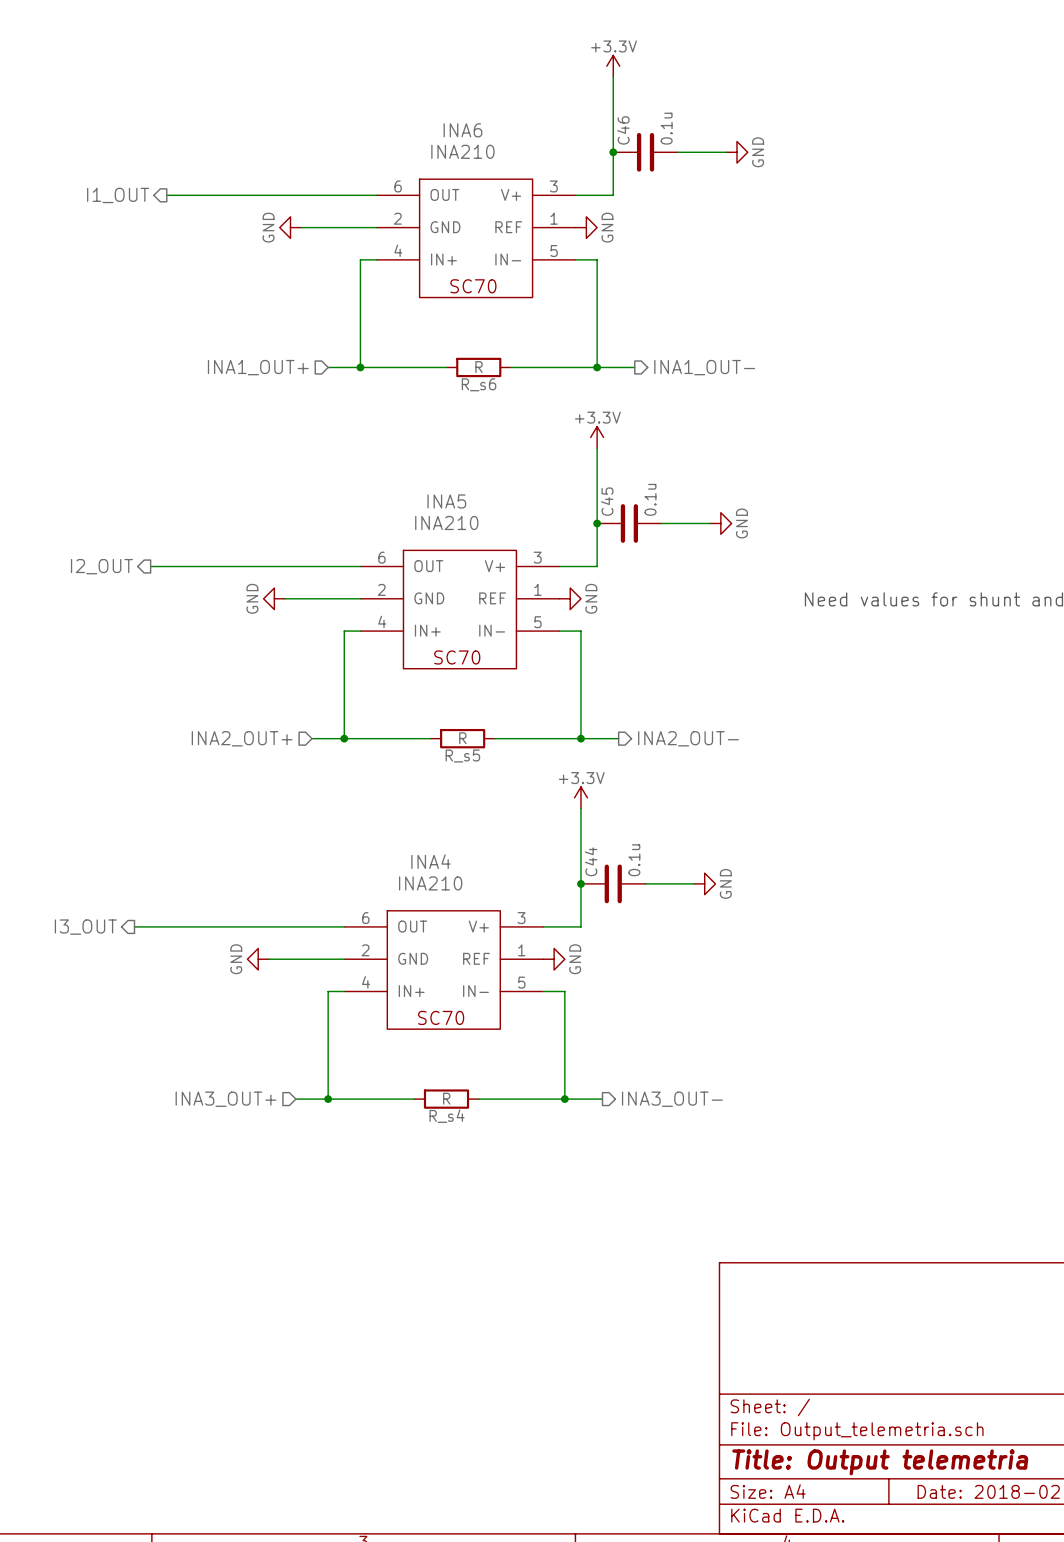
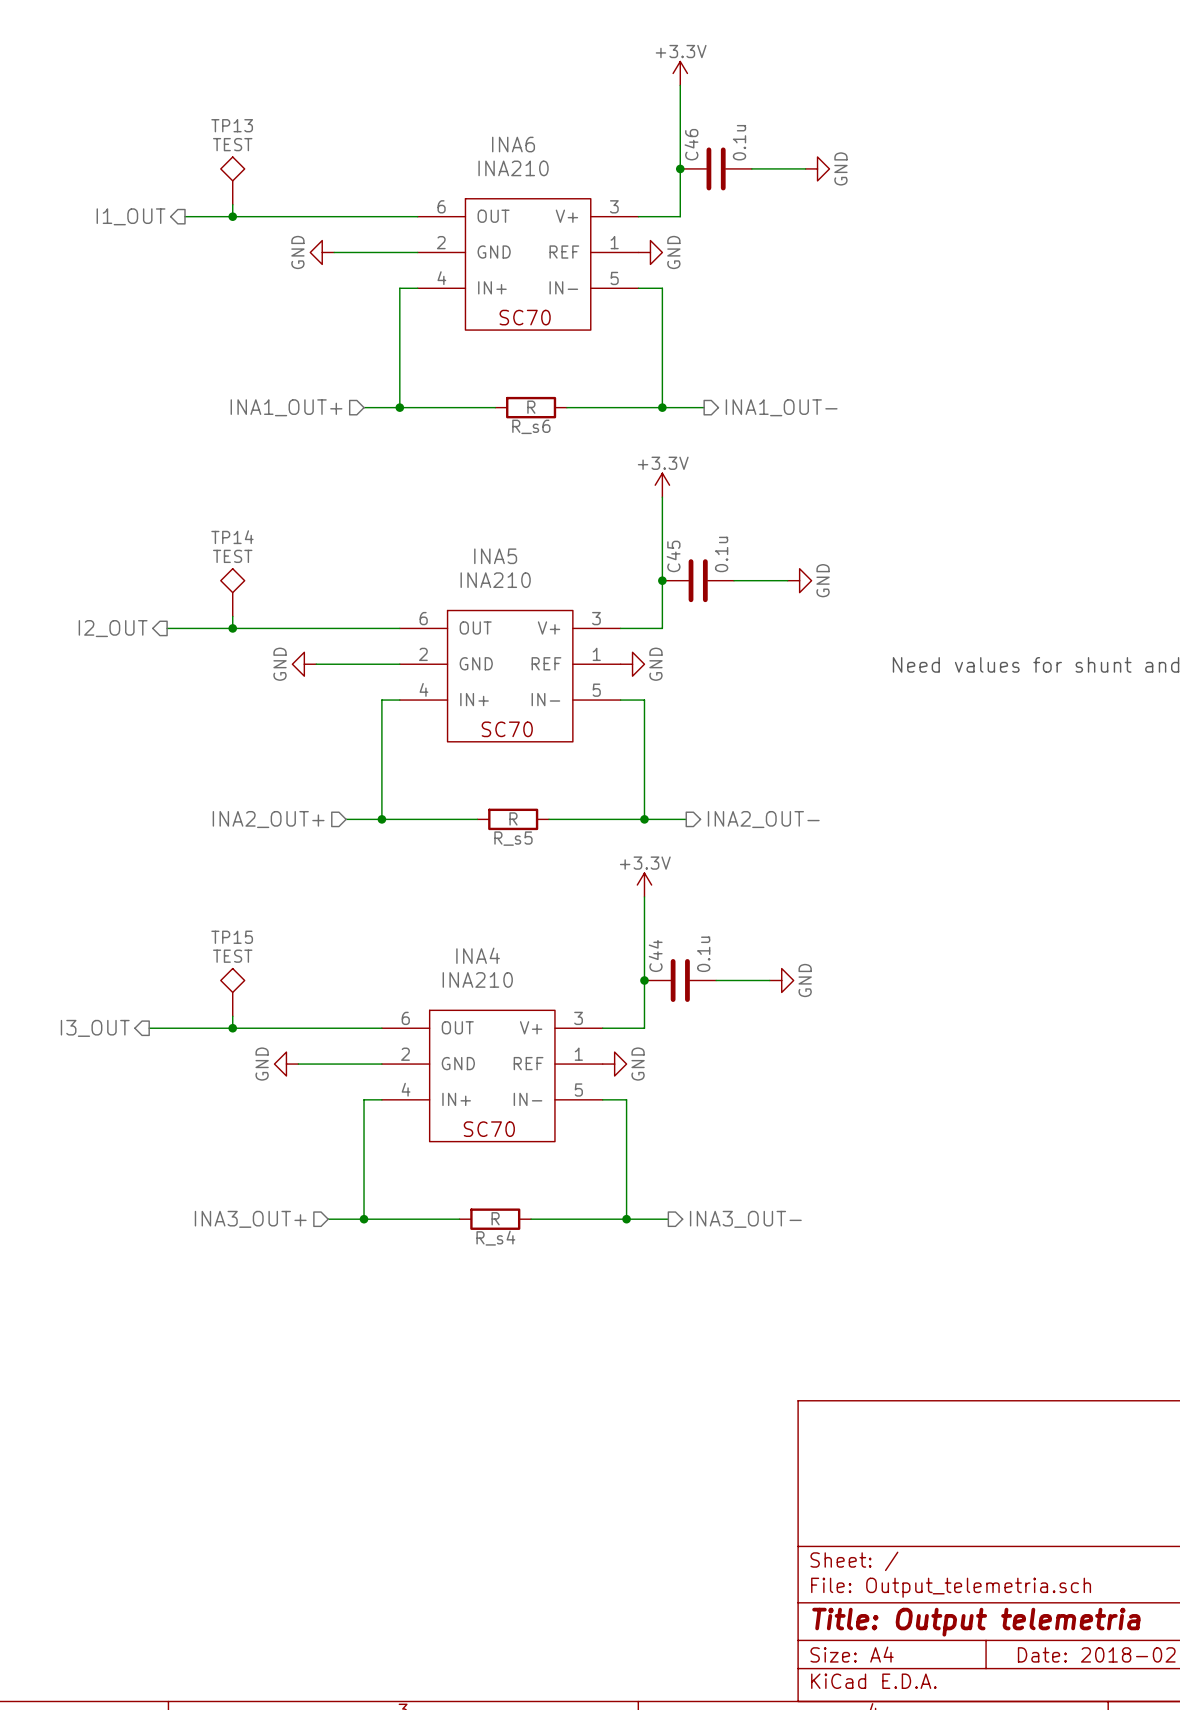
TP13: none -> TEST (232, 180)
wire: none -> (232, 204) (232, 216)
junction: none -> (232, 216)
TP14: none -> TEST (232, 592)
wire: none -> (232, 616) (232, 628)
junction: none -> (232, 628)
TP15: none -> TEST (232, 992)
wire: none -> (232, 1016) (232, 1028)
junction: none -> (232, 1028)

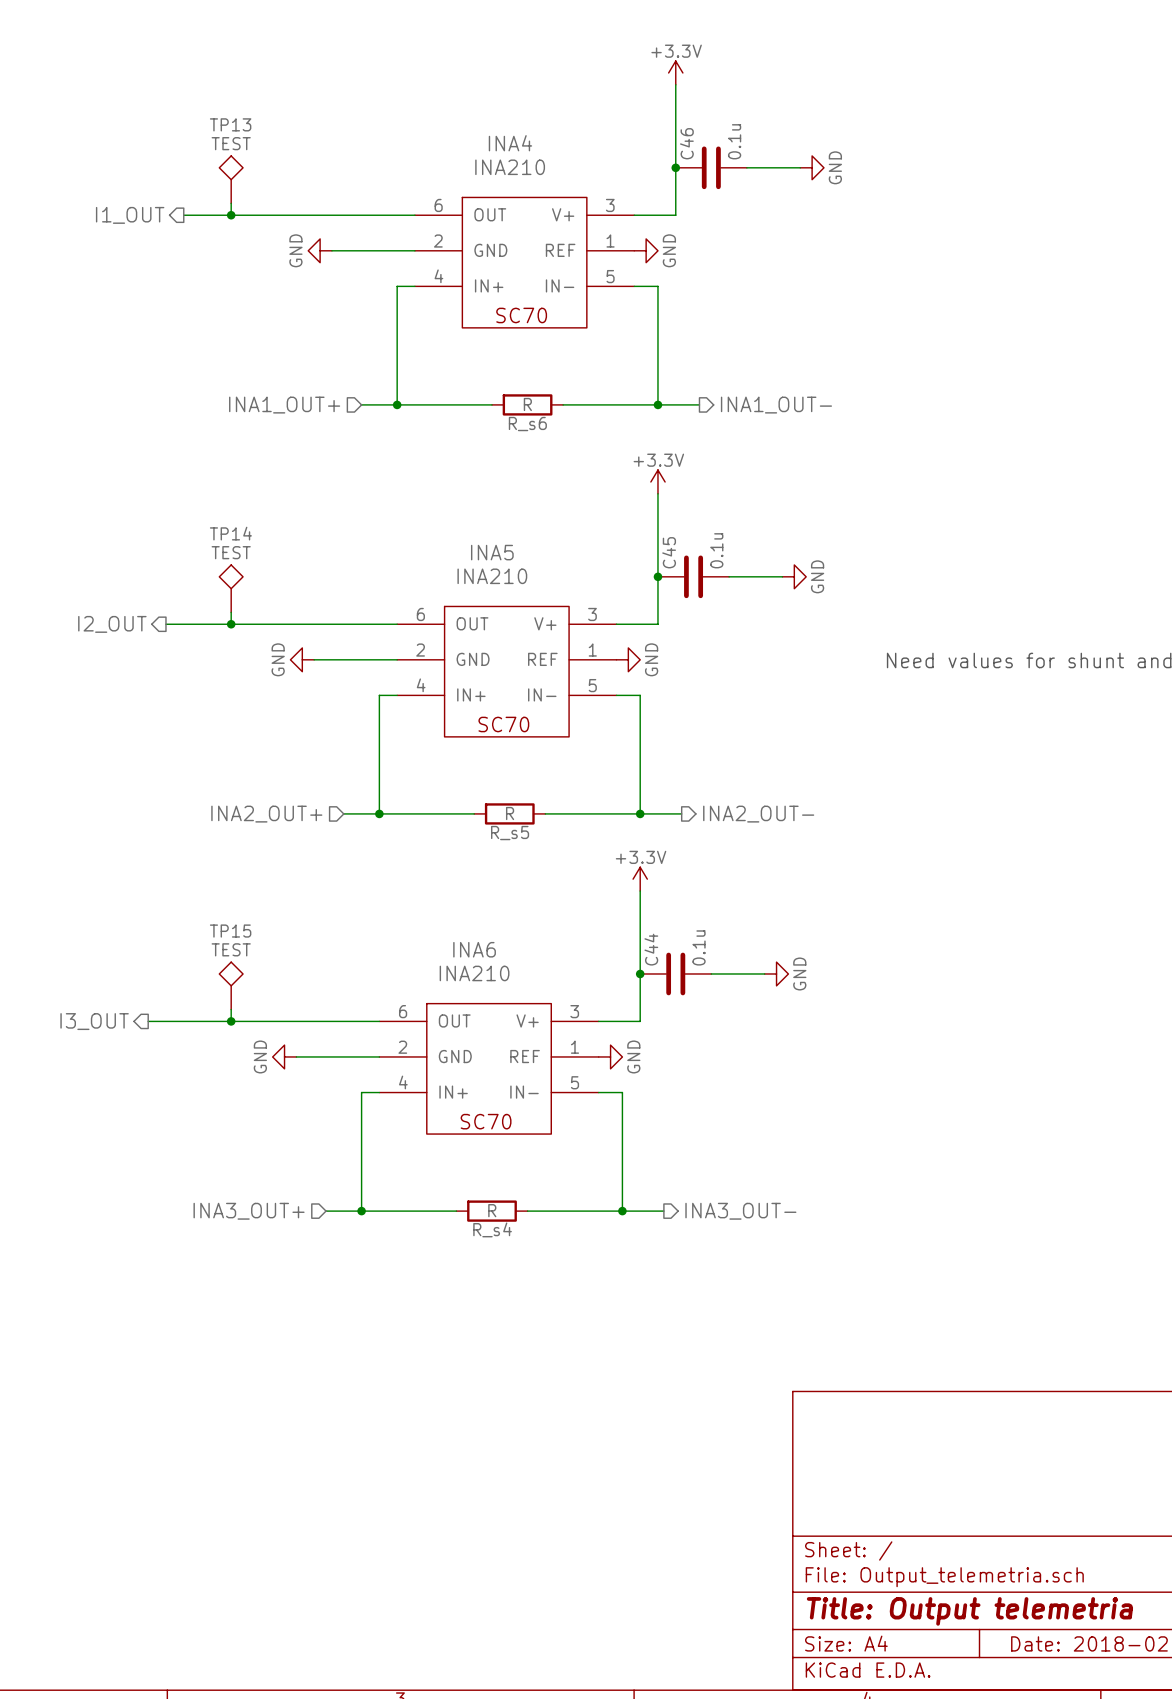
INA6 name: INA6 (513, 144) -> INA4 (510, 143)
INA4 name: INA4 (478, 955) -> INA6 (474, 949)

